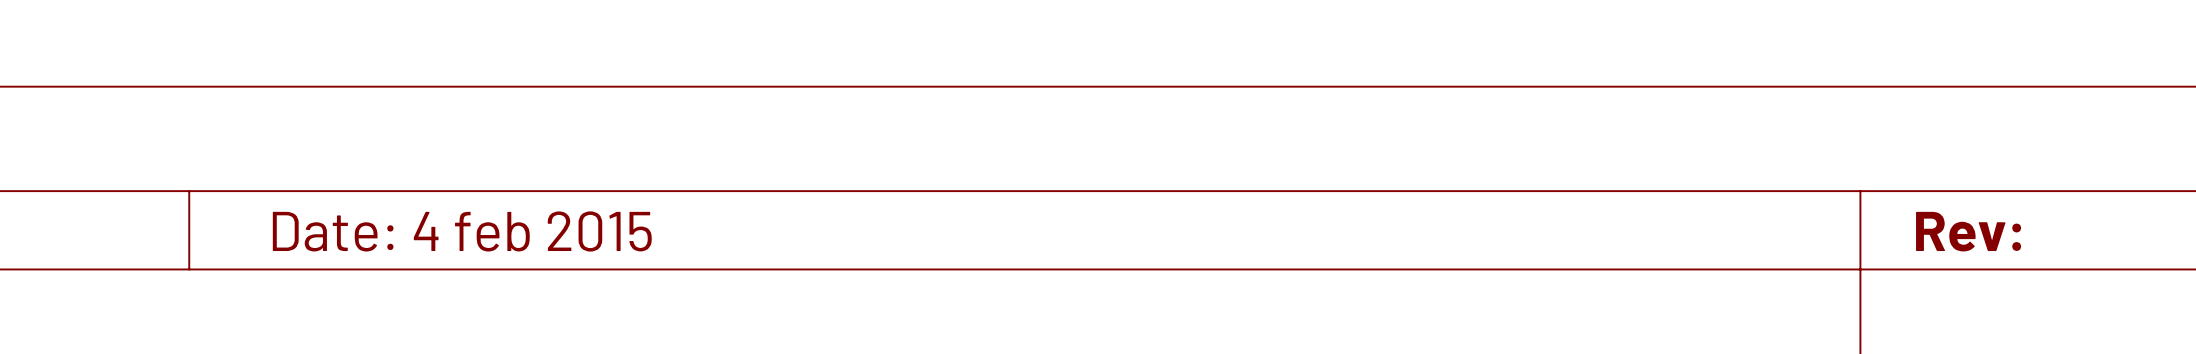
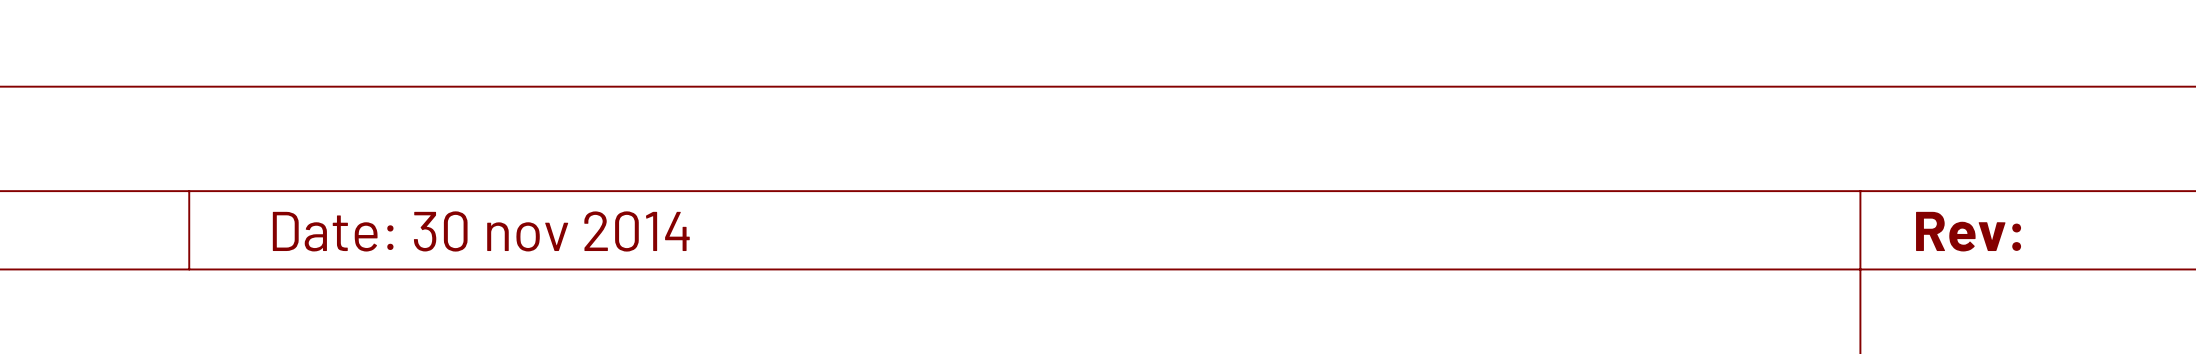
title block: Date: 4 feb 2015 (462, 231) -> Date: 30 nov 2014 (481, 231)

